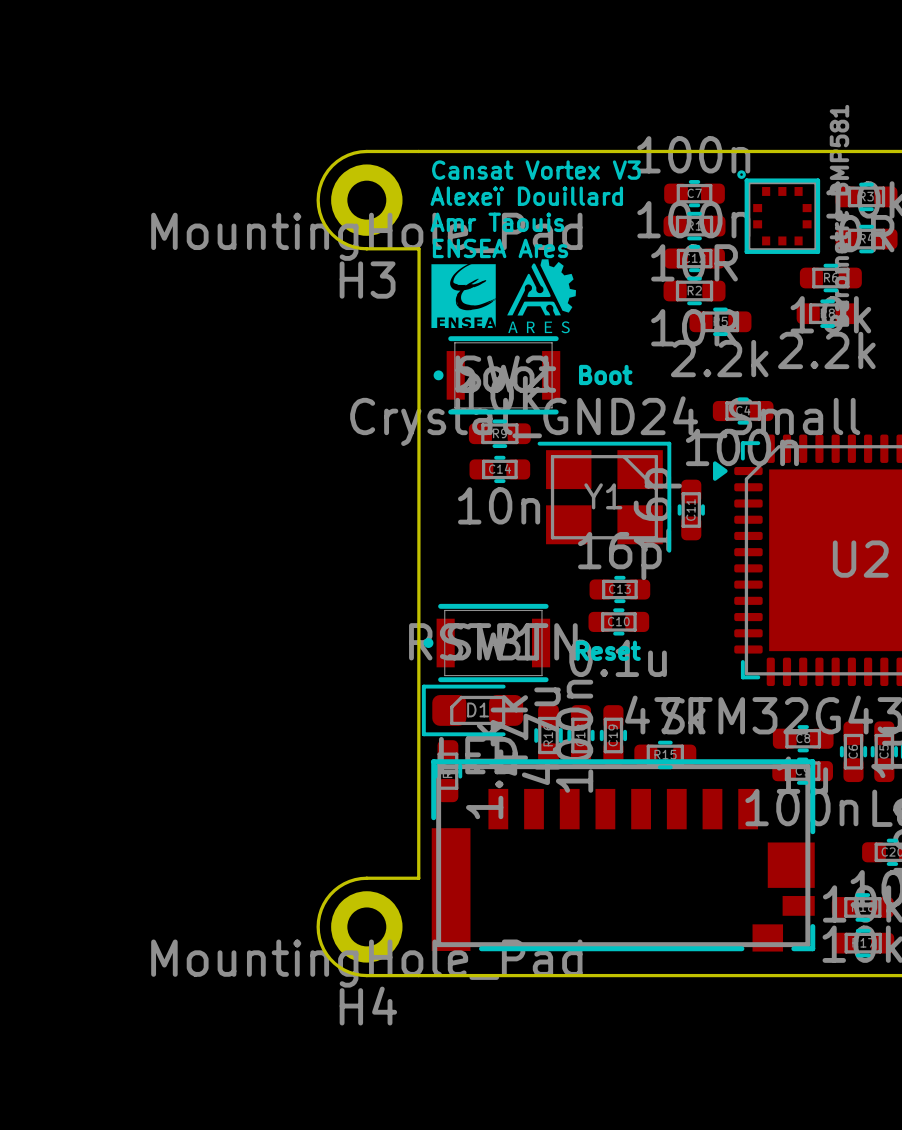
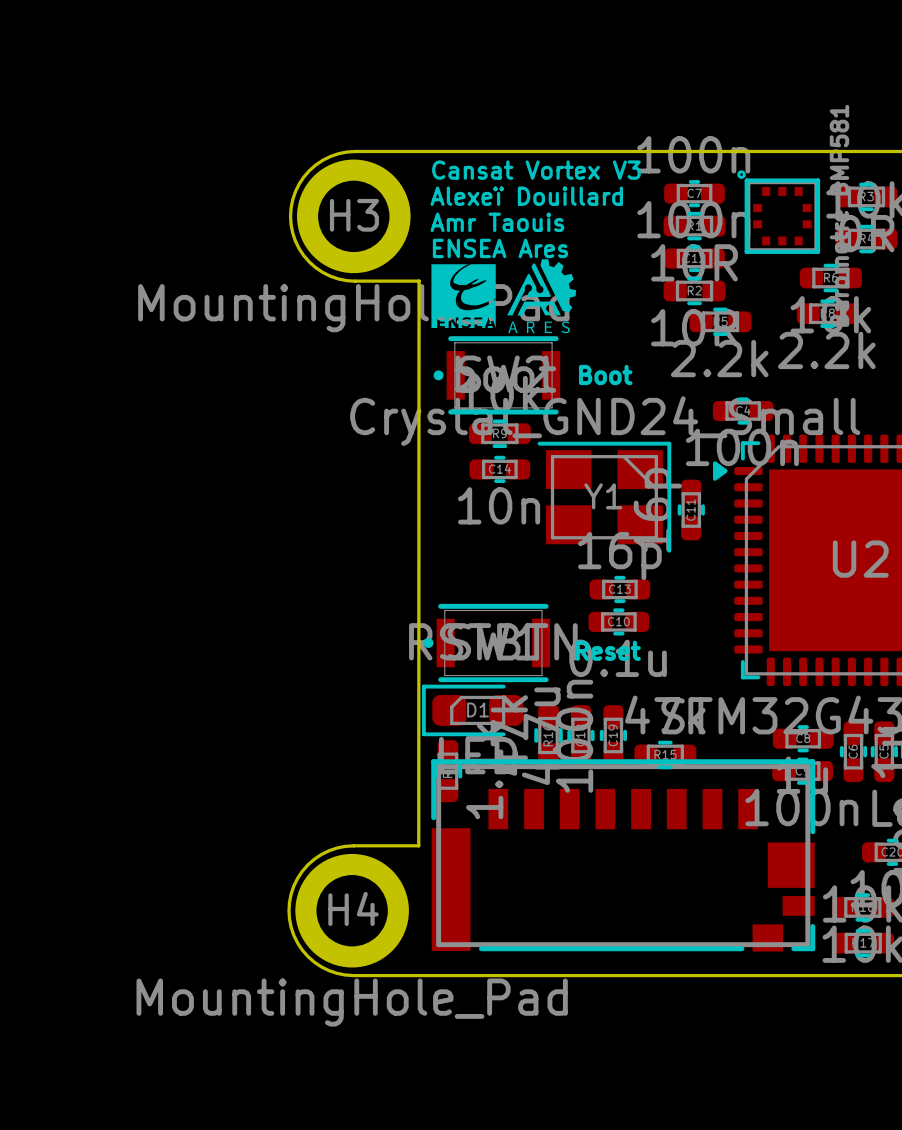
board edge: (366, 151) (354, 153) (342, 157) (332, 165) (324, 175) (319, 187) (318, 200) (319, 212) (324, 224) (337, 238) (354, 247) (418, 248) -> (366, 151) (346, 152) (330, 156) (315, 164) (303, 176) (295, 191) (291, 207) (291, 224) (295, 241) (303, 255) (315, 267) (338, 279) (355, 281) (419, 281)
H3 footprint: [331, 164, 403, 236] -> [297, 159, 411, 274]
board edge: (419, 248) (419, 281) -> none
H3 name position: H3 (367, 280) -> H3 (354, 215)
board edge: (418, 845) (418, 878) (366, 878) (349, 881) (334, 890) (321, 909) (318, 932) (326, 954) (344, 970) (366, 975) -> (418, 845) (353, 845) (337, 848) (321, 854) (307, 864) (293, 885) (289, 902) (289, 919) (293, 935) (302, 950) (314, 962) (329, 970) (345, 975) (366, 975)
H4 footprint: [331, 891, 403, 963] -> [295, 853, 409, 968]
H4 name position: H4 (368, 1006) -> H4 (353, 908)

